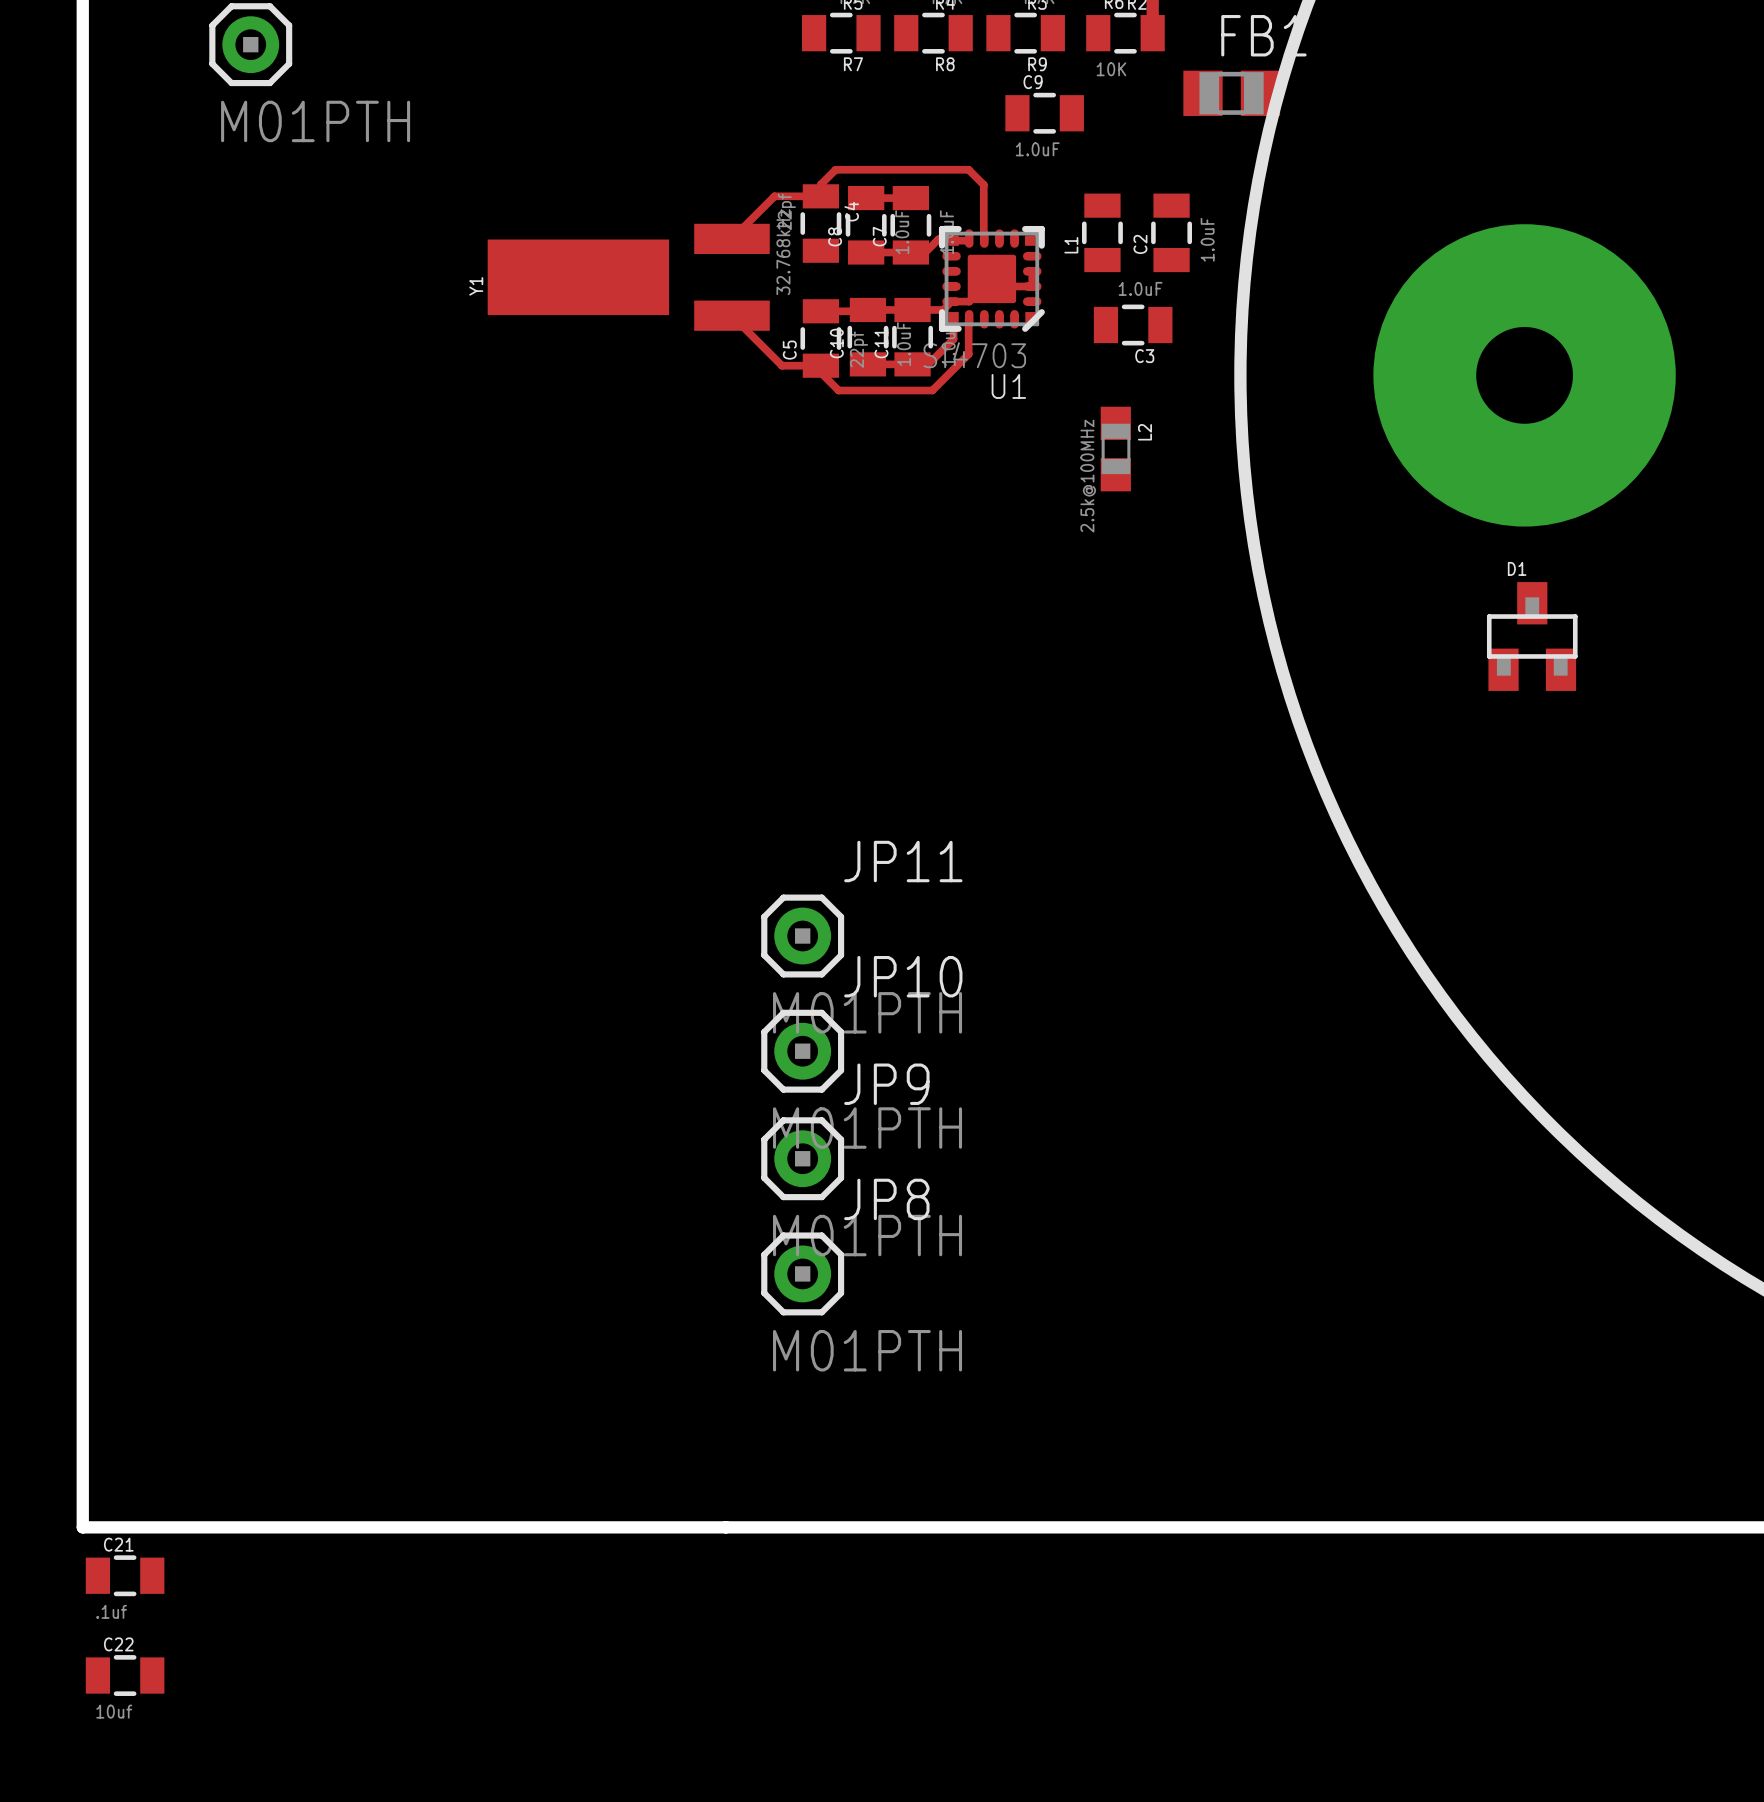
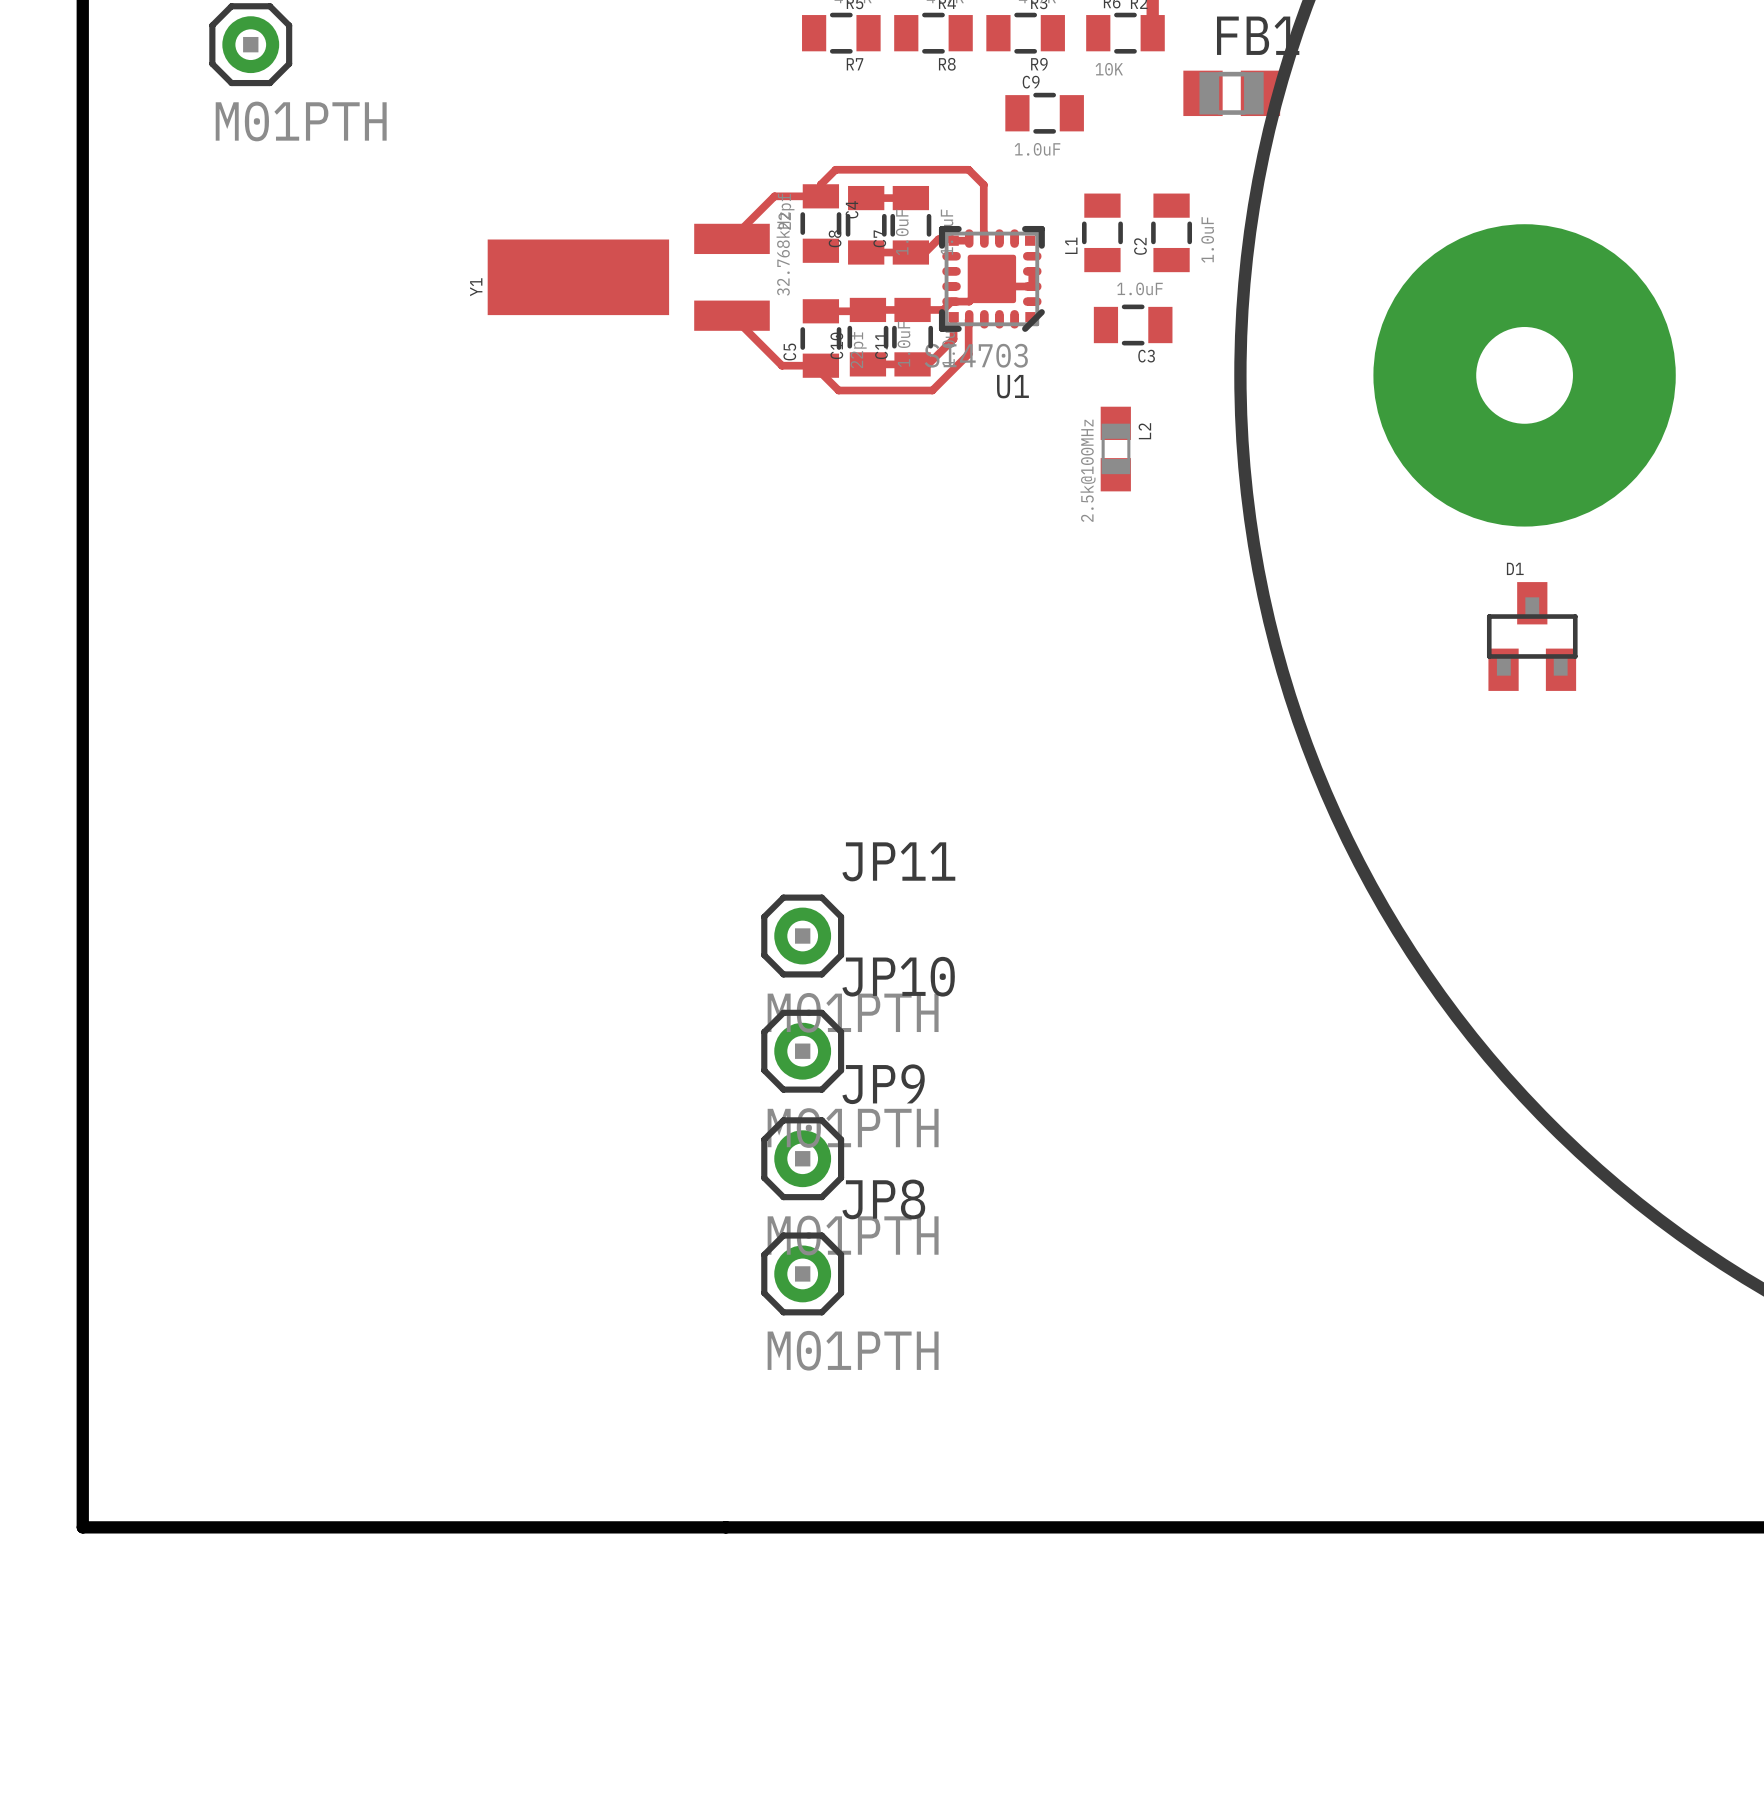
C21: .1uf (125, 1575) -> none
C22: 10uf (125, 1675) -> none

